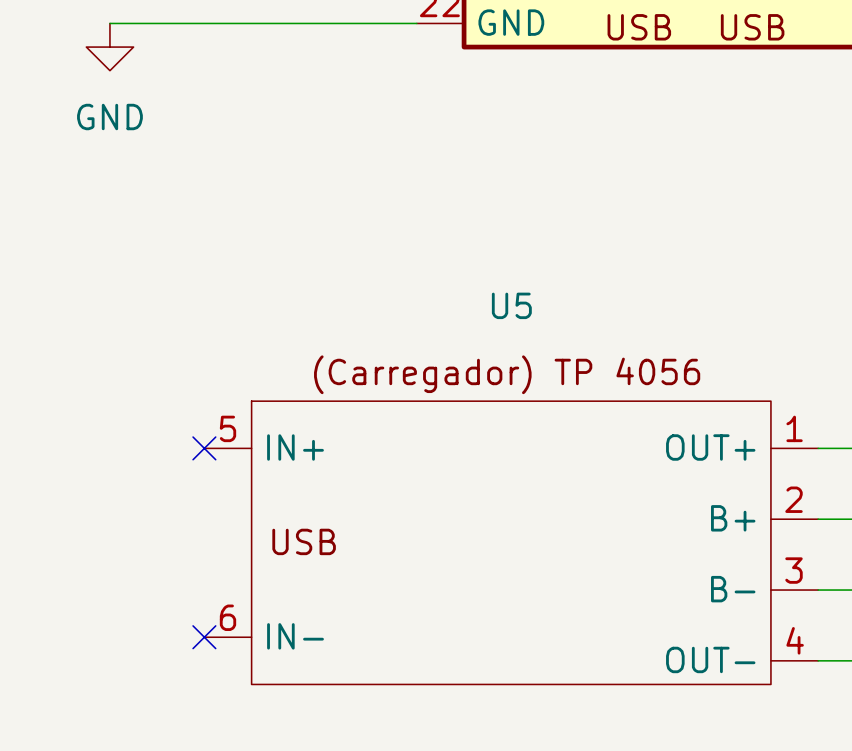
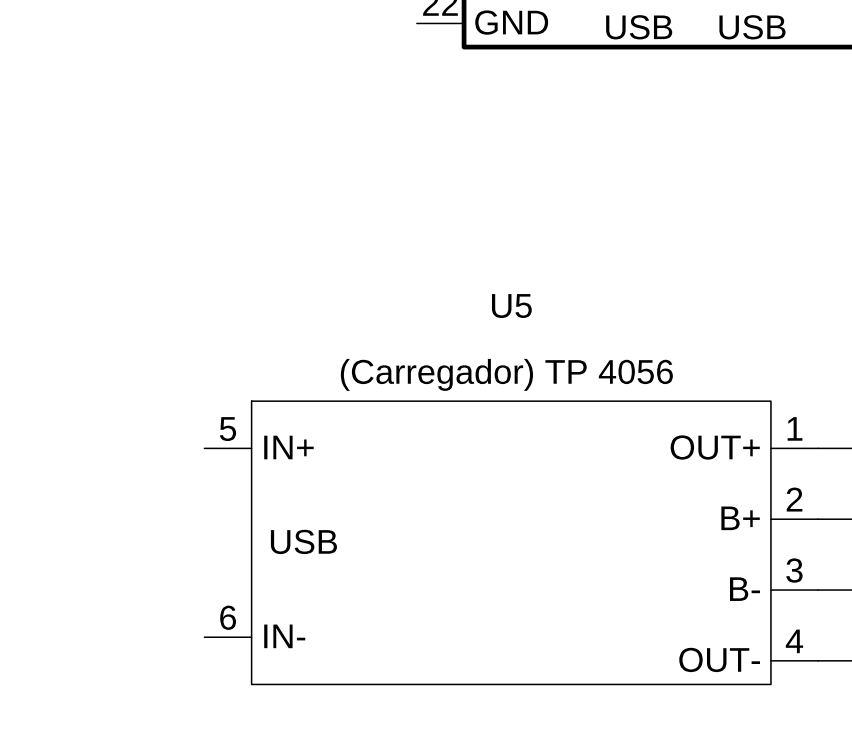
wire: (109, 23) (416, 23) -> none
power symbol: GND (109, 47) -> none
no-connect mark: (204, 448) -> none
no-connect mark: (204, 637) -> none

